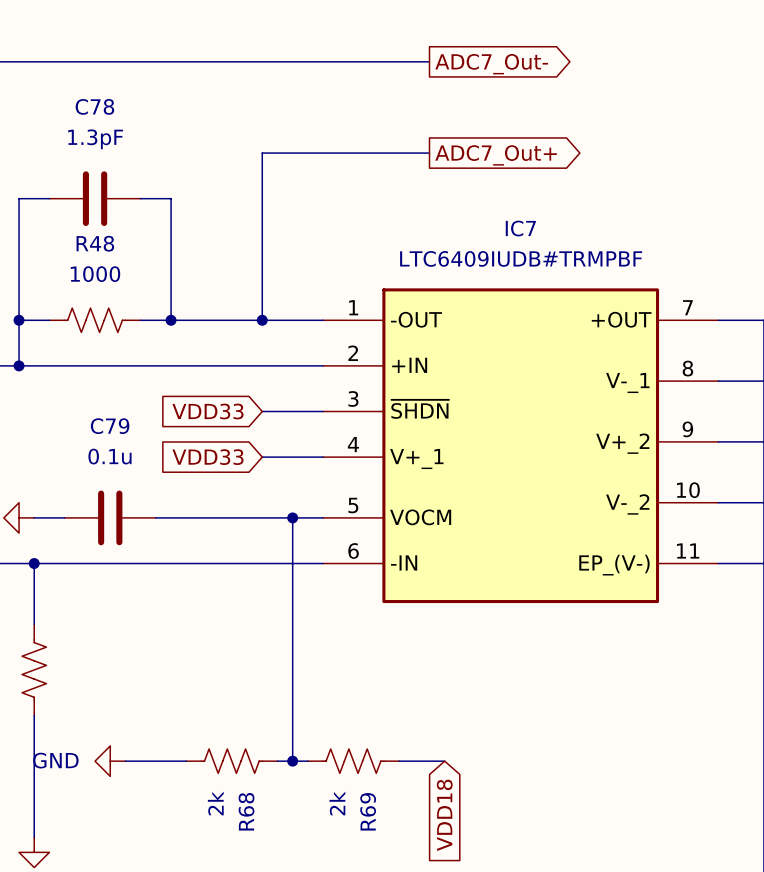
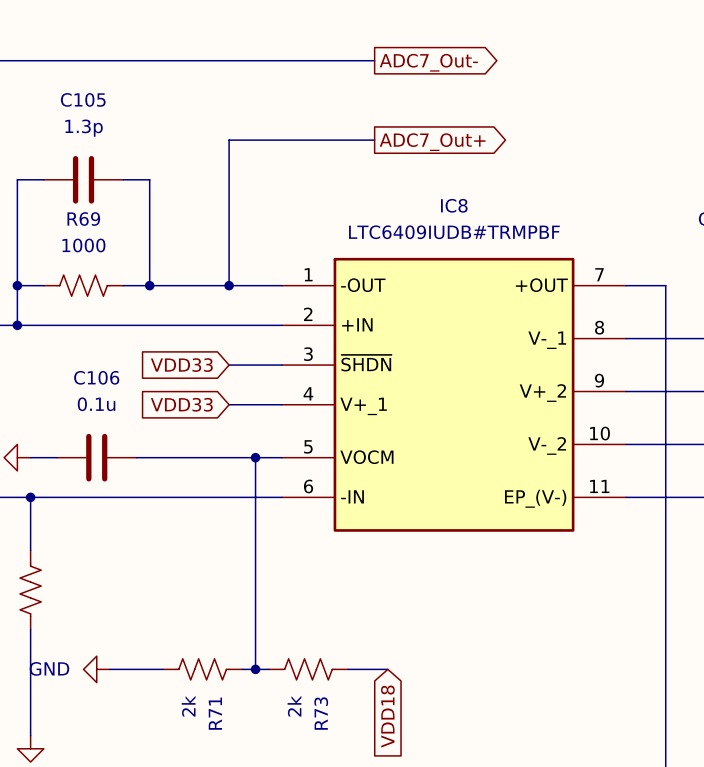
C78 name: C78 (94, 106) -> C105 (83, 99)
C78 value: 1.3pF (95, 139) -> 1.3p (84, 128)
IC7 name: IC7 (520, 228) -> IC8 (454, 205)
R48 name: R48 (95, 243) -> R69 (83, 219)
C79 name: C79 (110, 426) -> C106 (96, 377)
R68 name: R68 (246, 811) -> R71 (215, 713)
R69 name: R69 (368, 811) -> R73 (321, 713)

